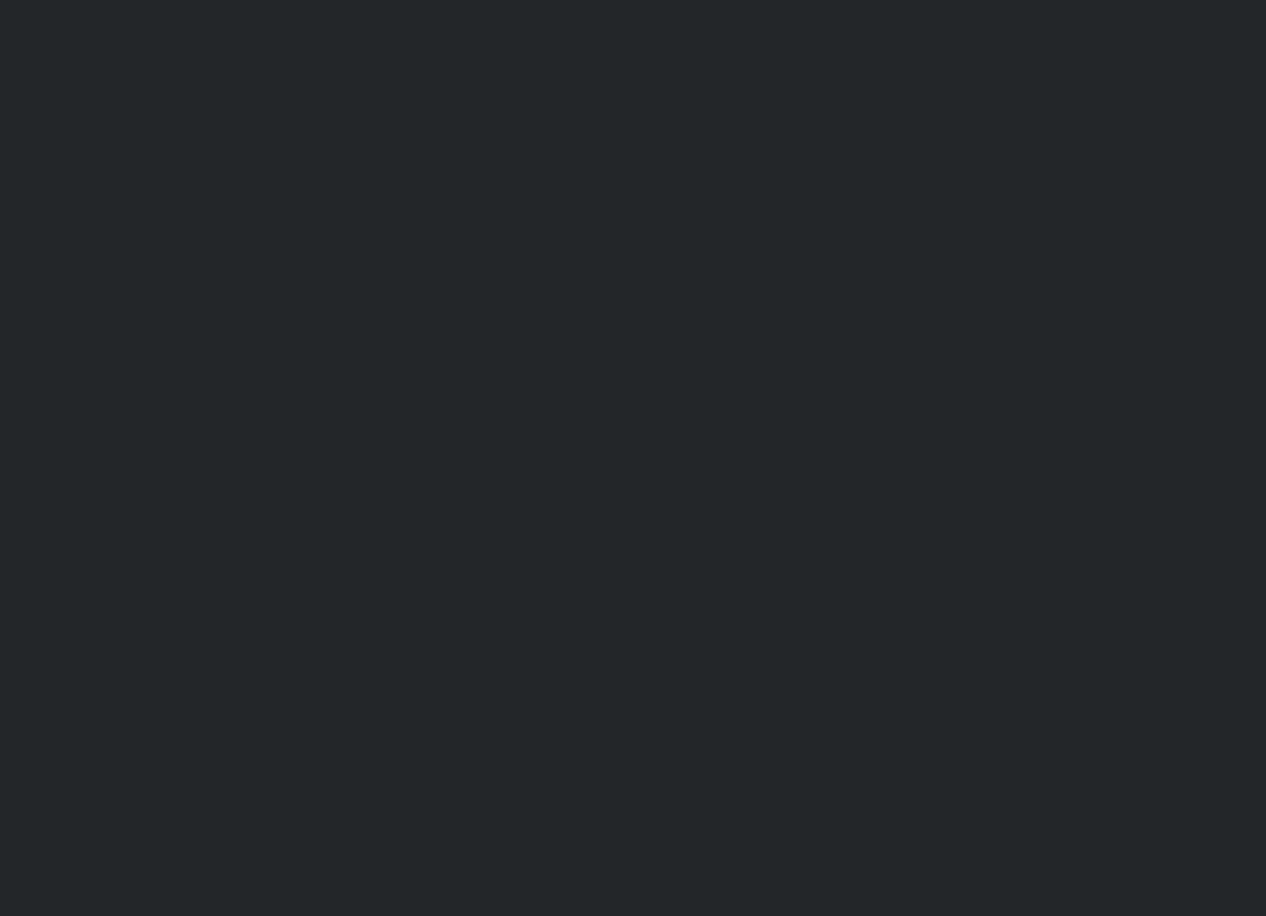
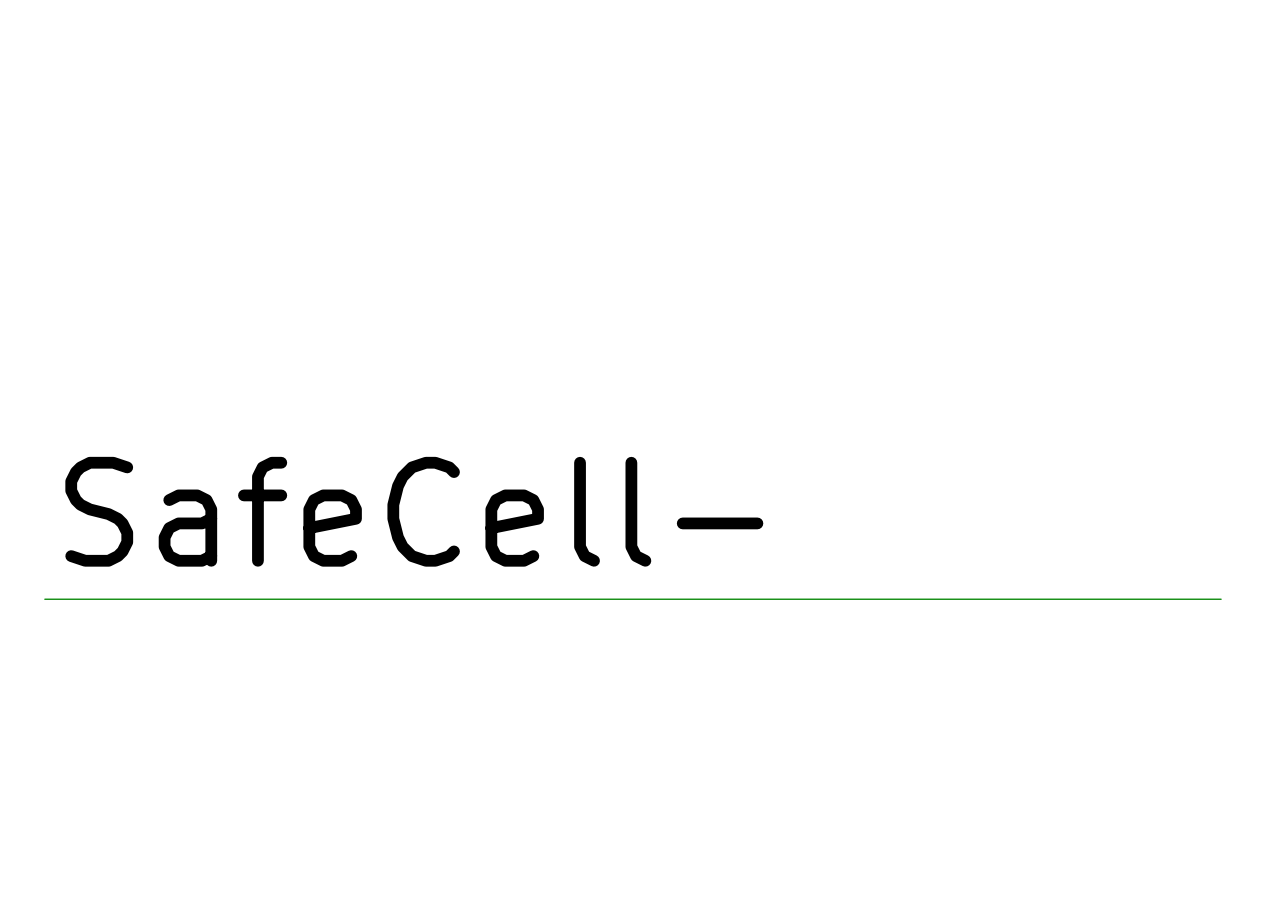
label: none -> SafeCell- (414, 511)
wire: none -> (44, 599) (1221, 599)

